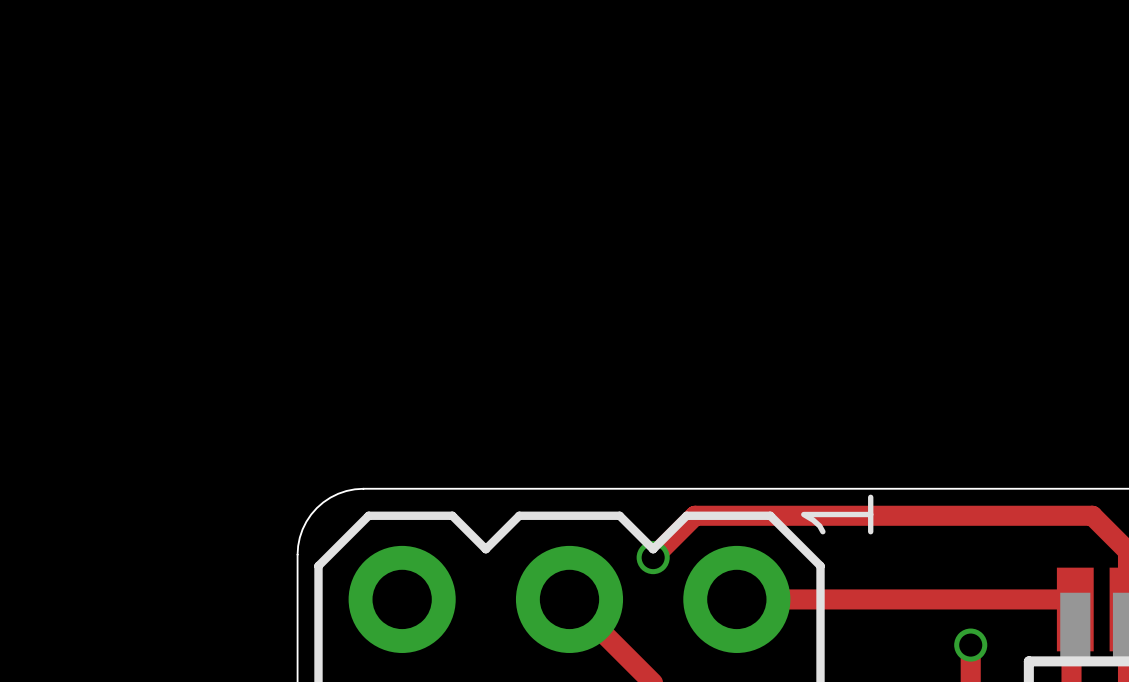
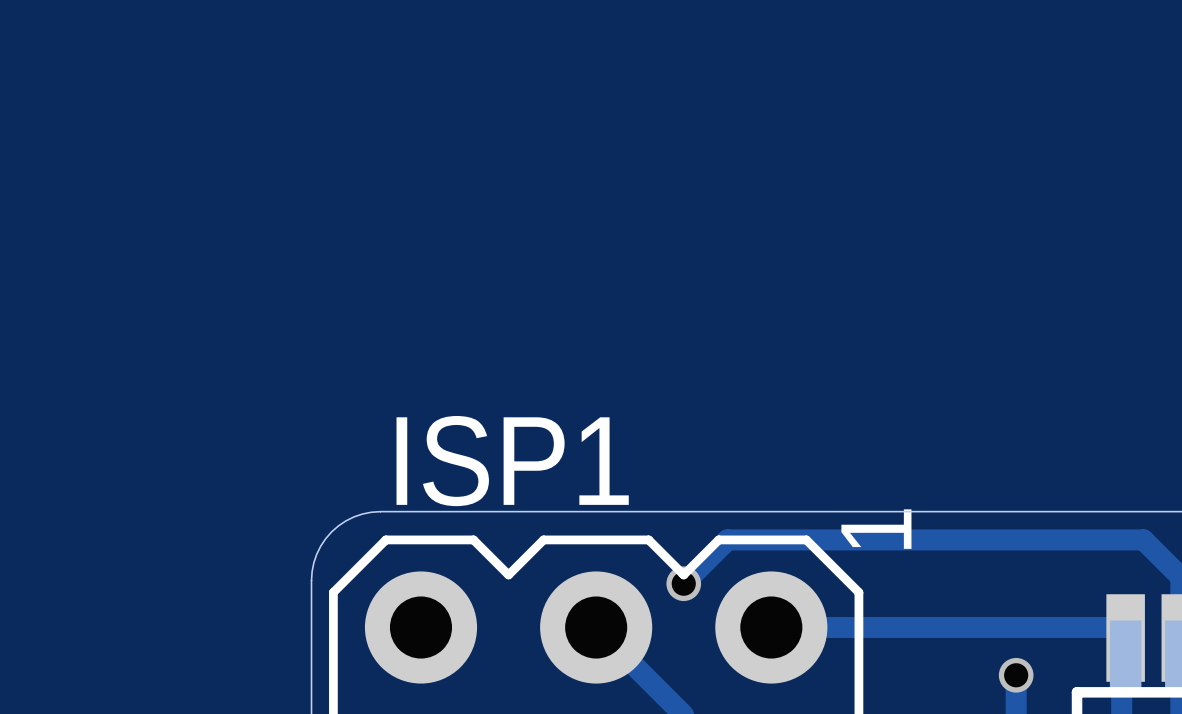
ISP1 name: none -> ISP1 (512, 461)

